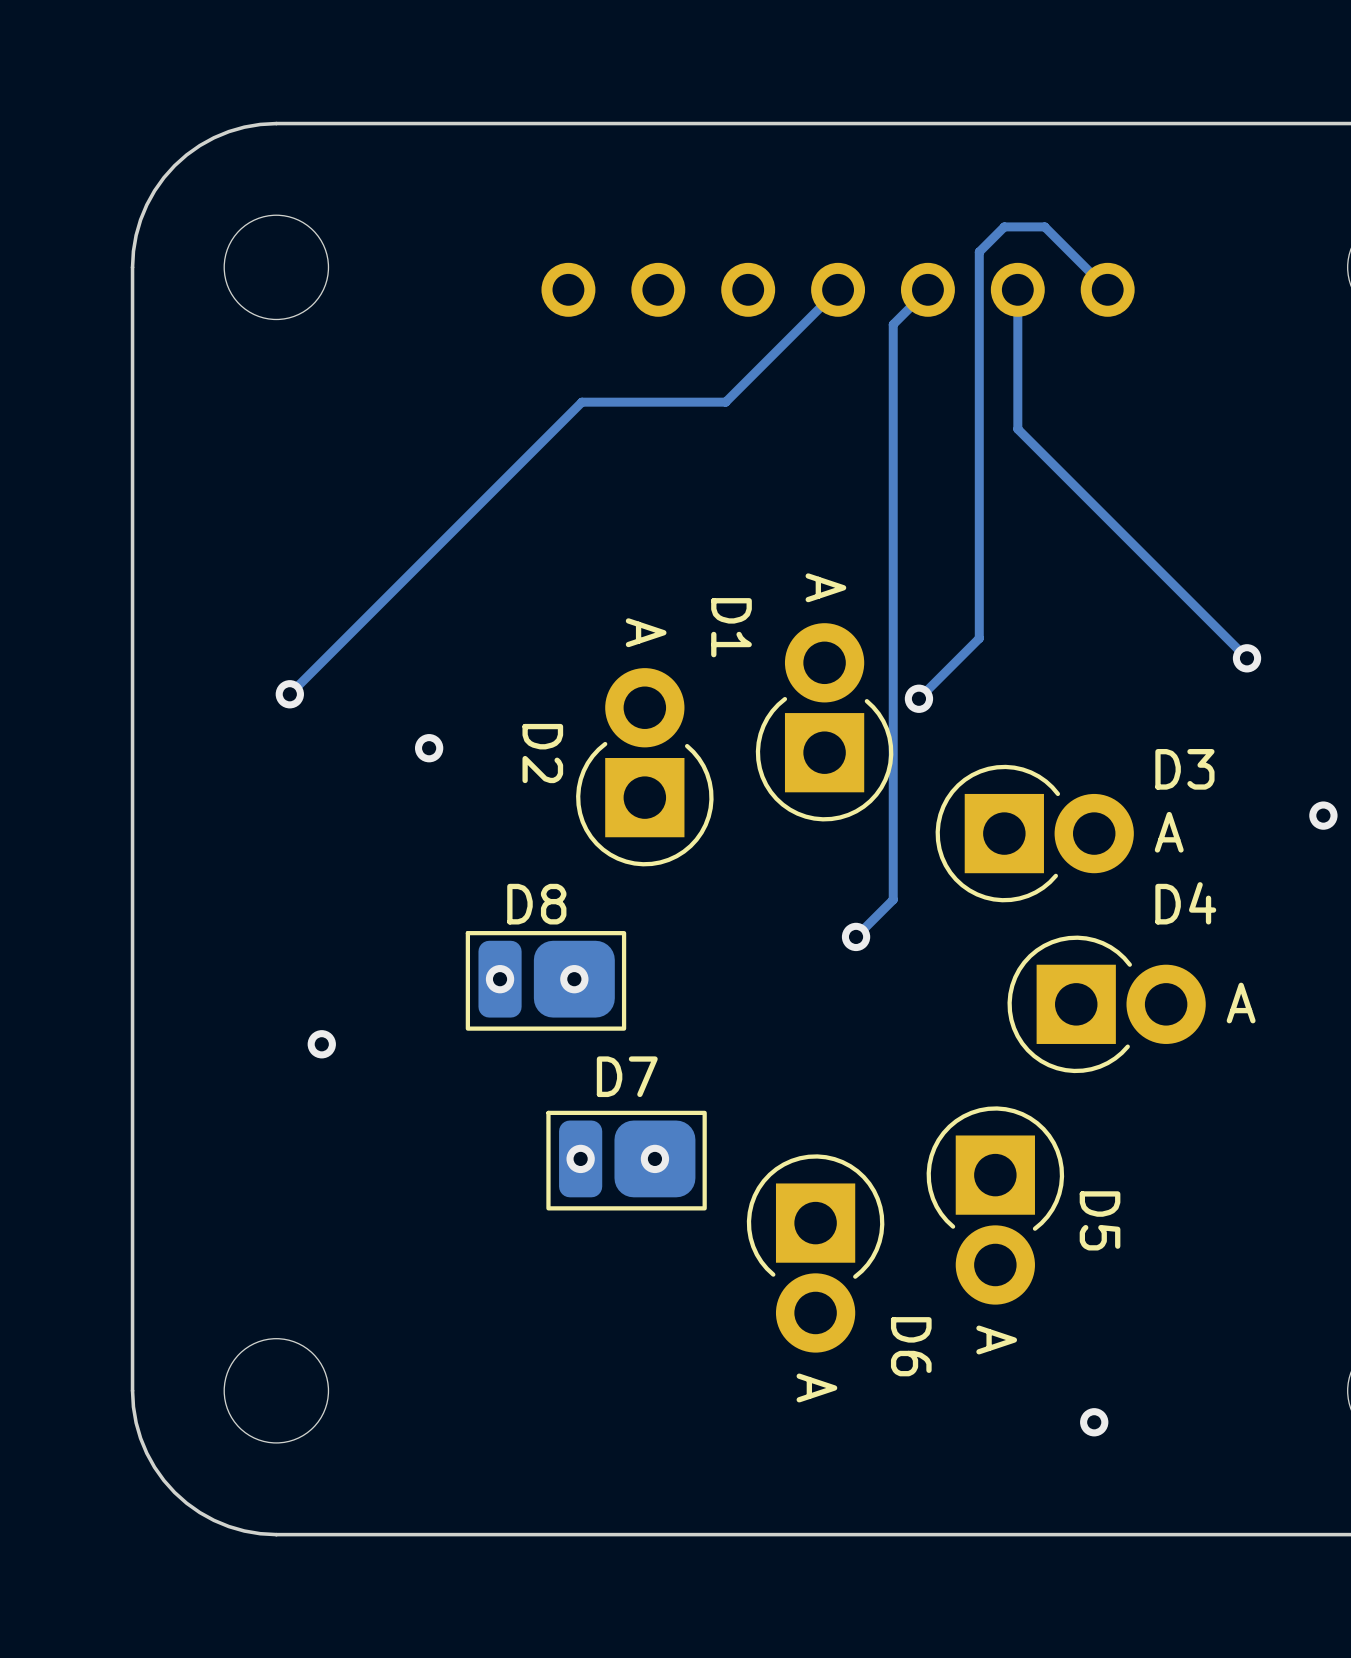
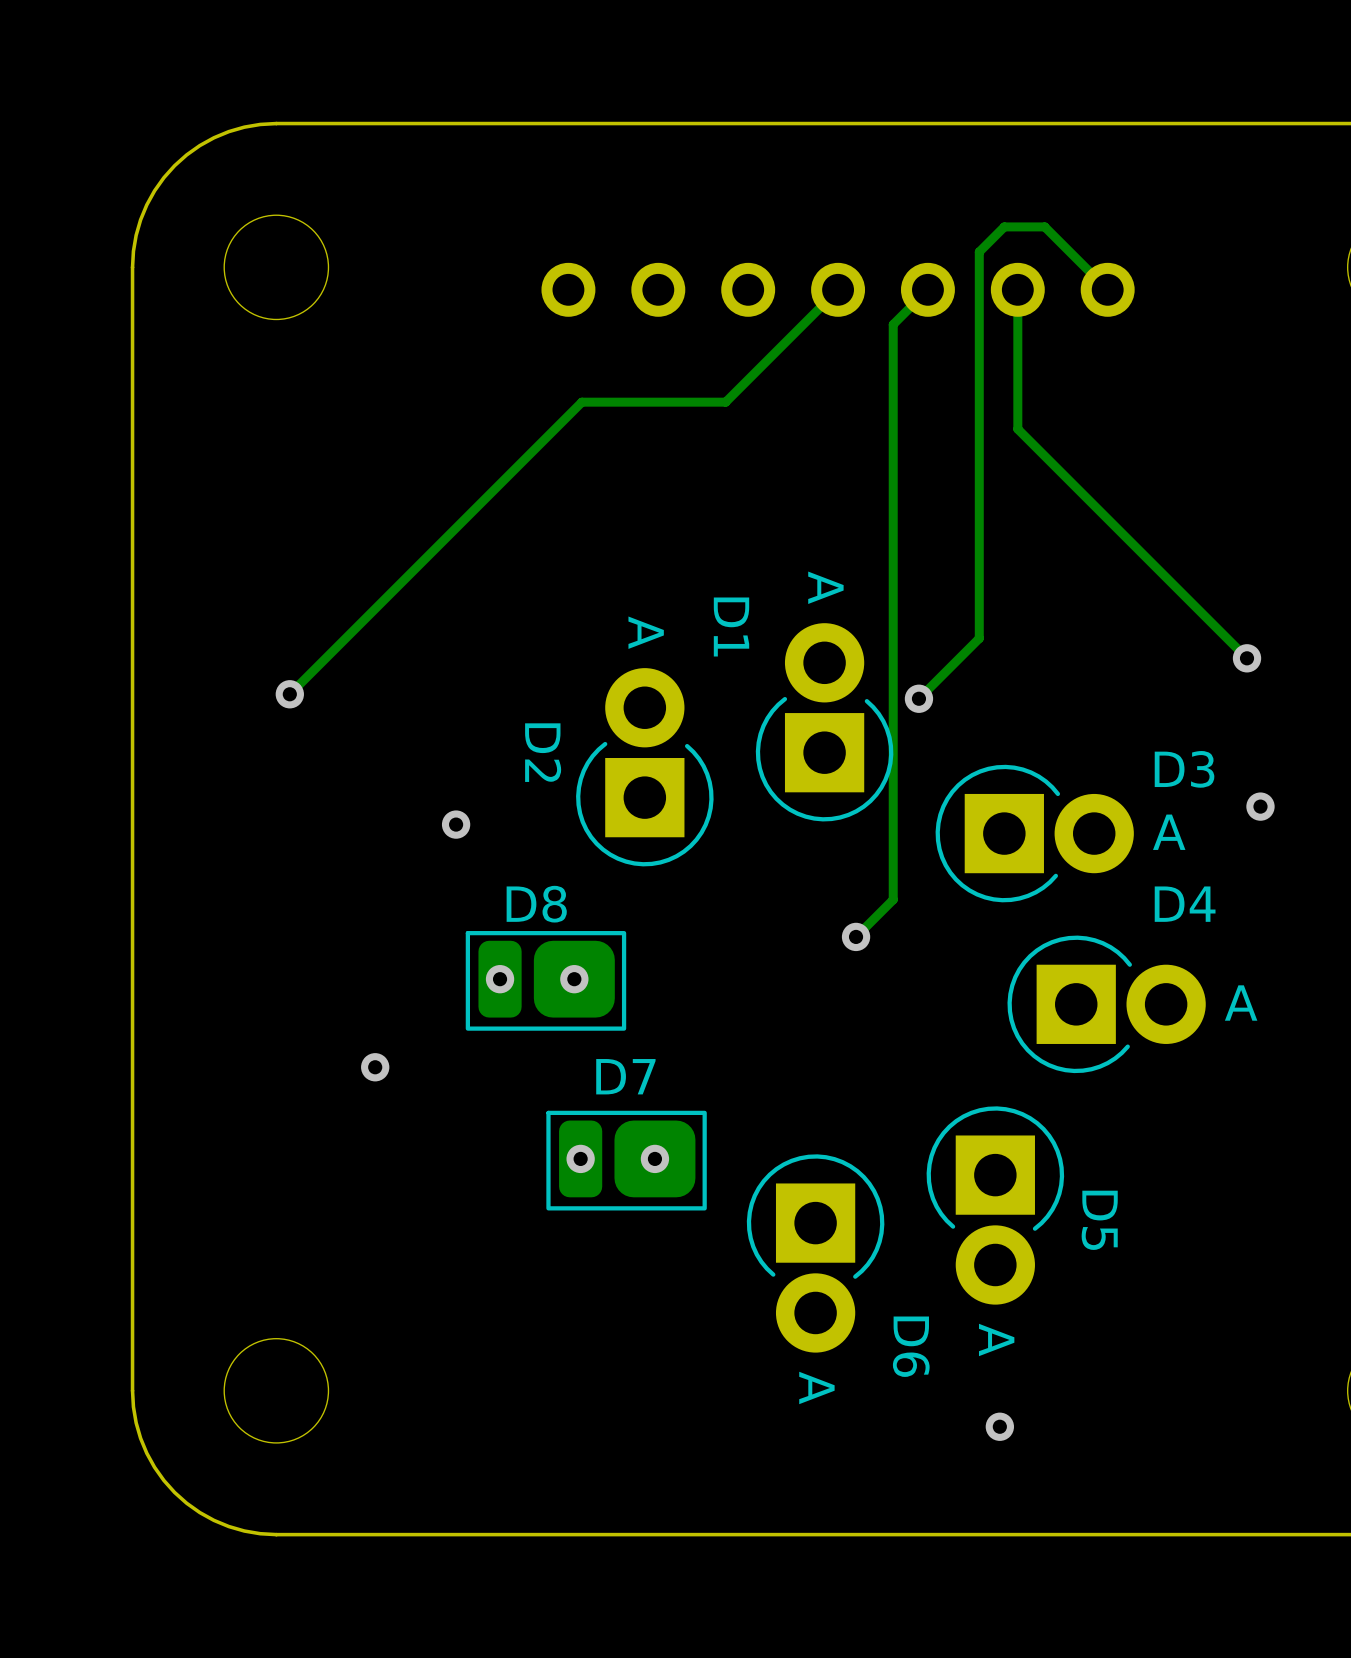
via position: (429, 748) -> (456, 824)
via position: (1323, 815) -> (1260, 806)
via position: (321, 1044) -> (375, 1067)
via position: (1094, 1422) -> (999, 1426)

